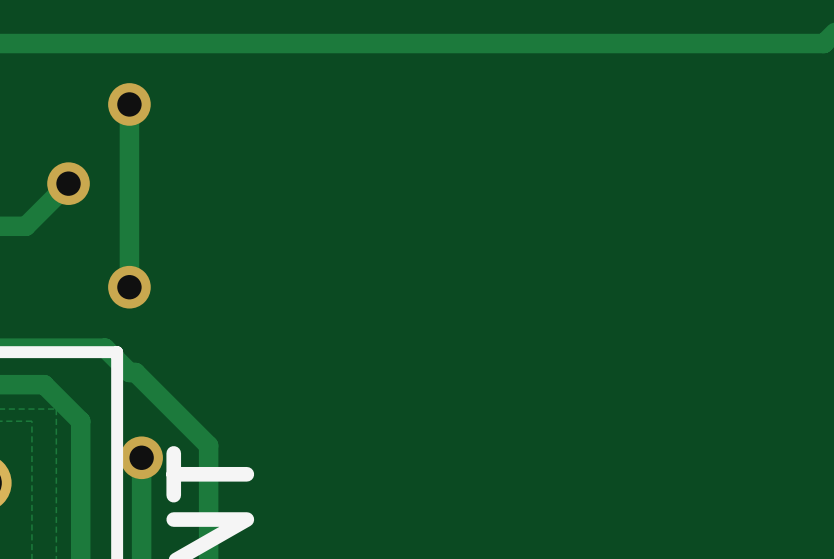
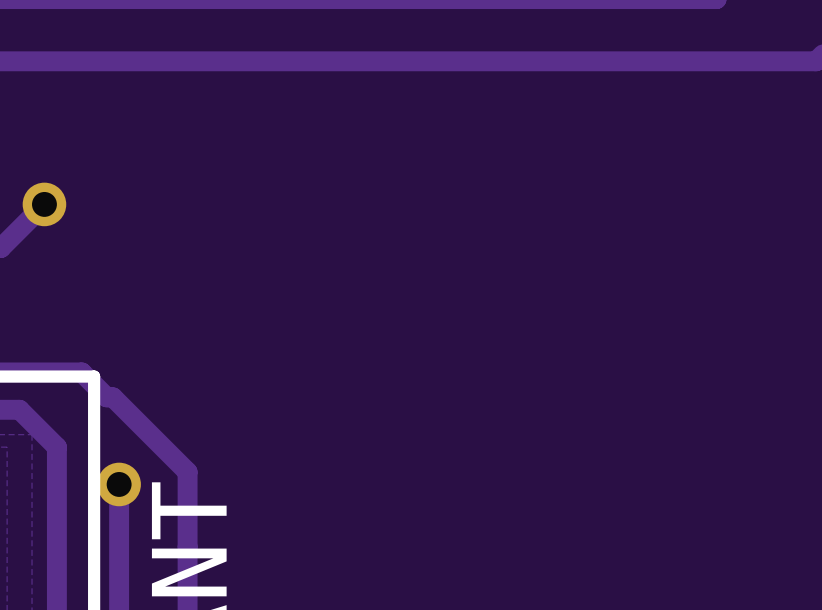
track: (129, 104) (129, 287) -> none
via: (129, 104) -> none
via: (129, 287) -> none

